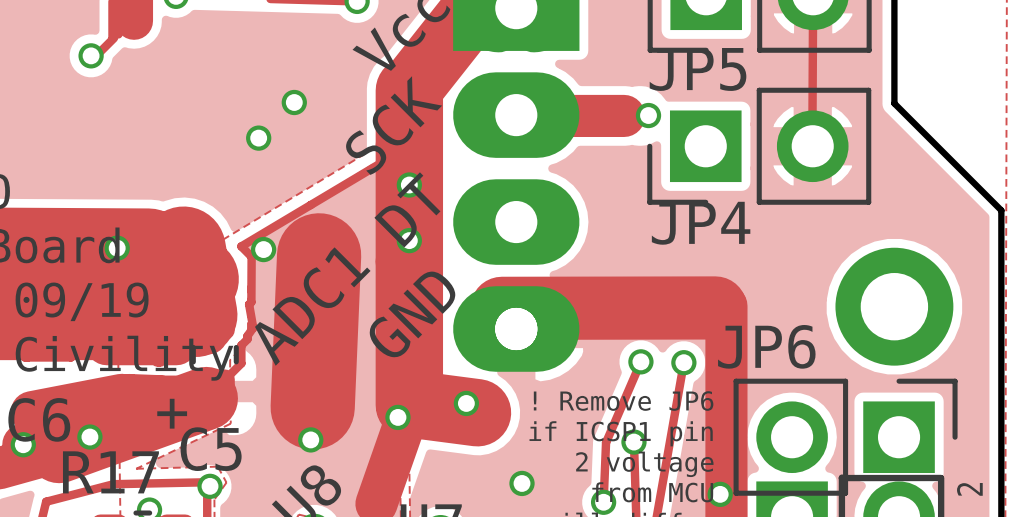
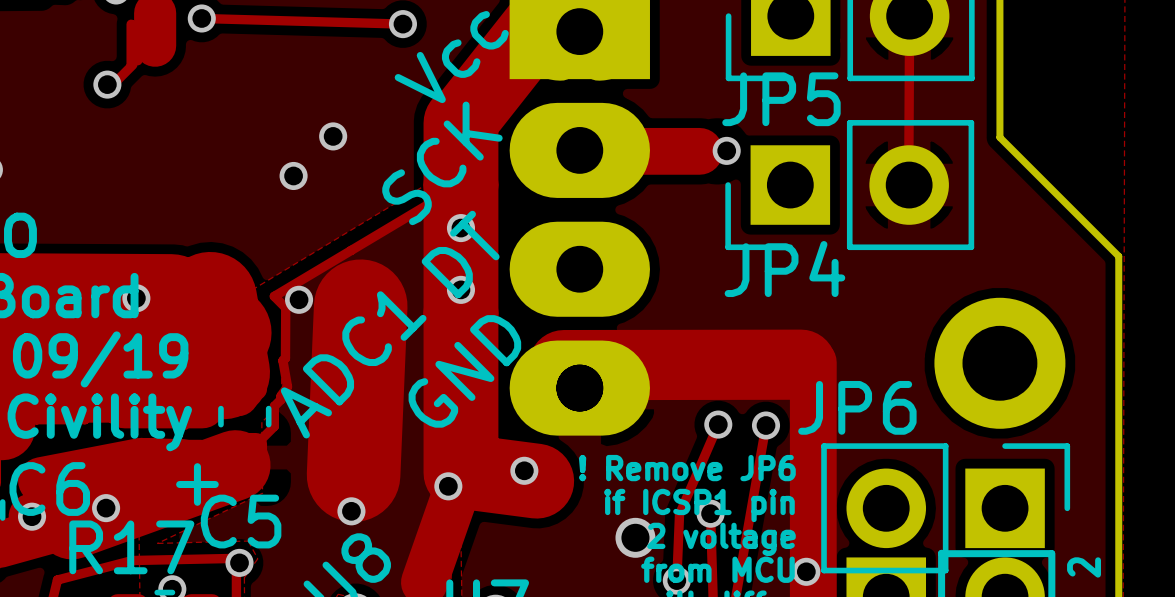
via: none -> (635, 537)
via: (522, 483) -> none

